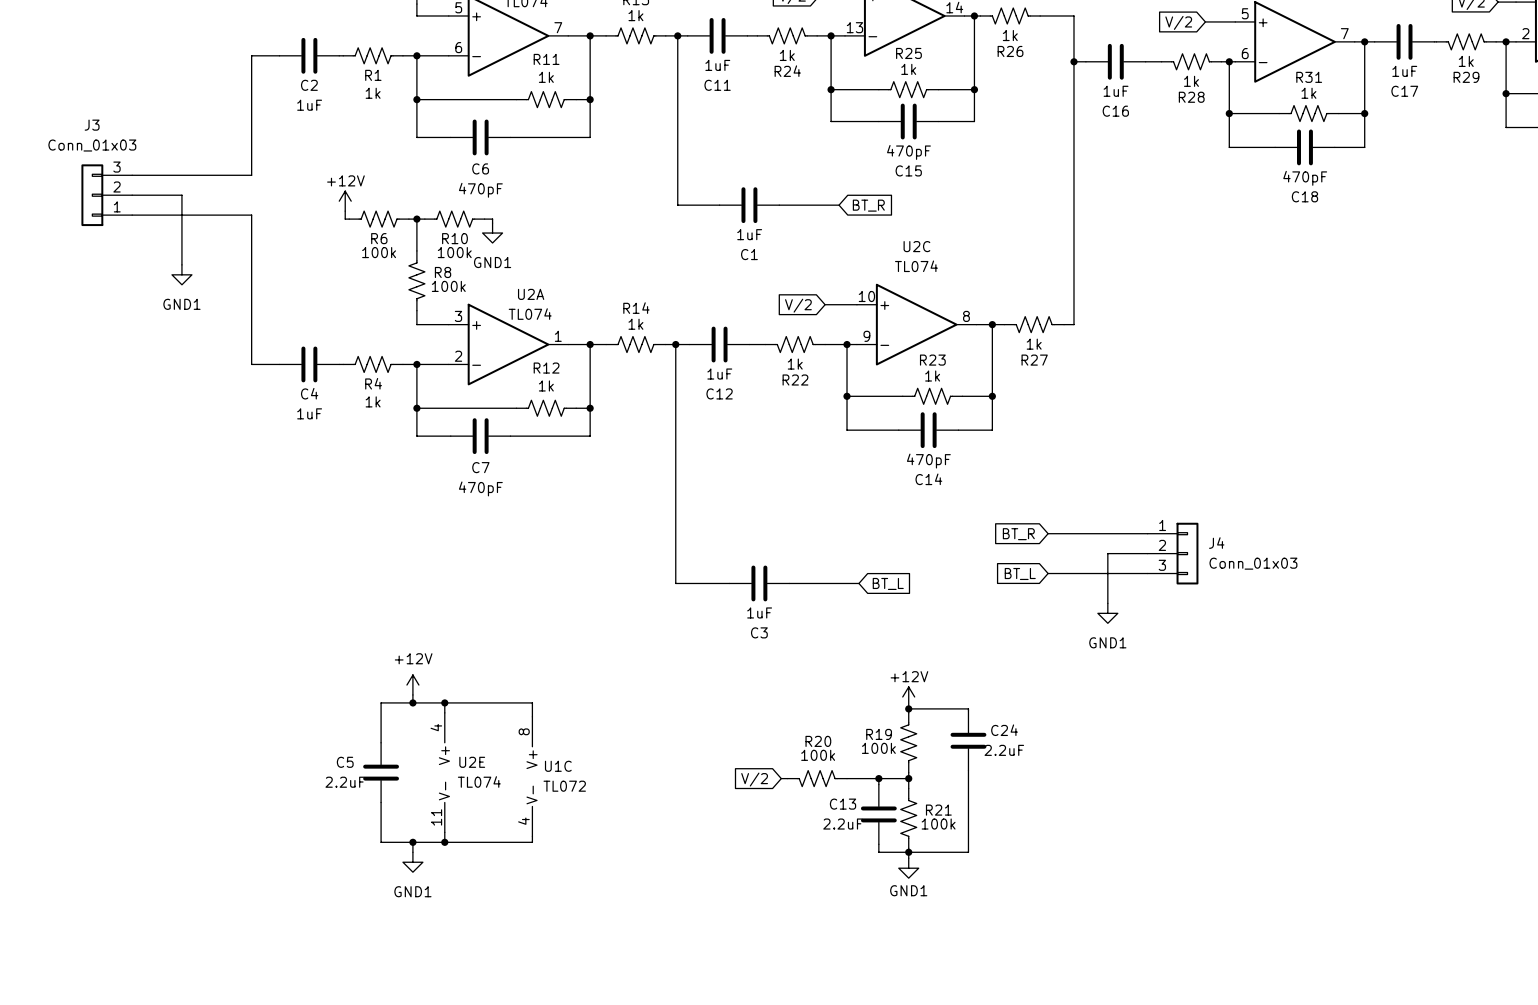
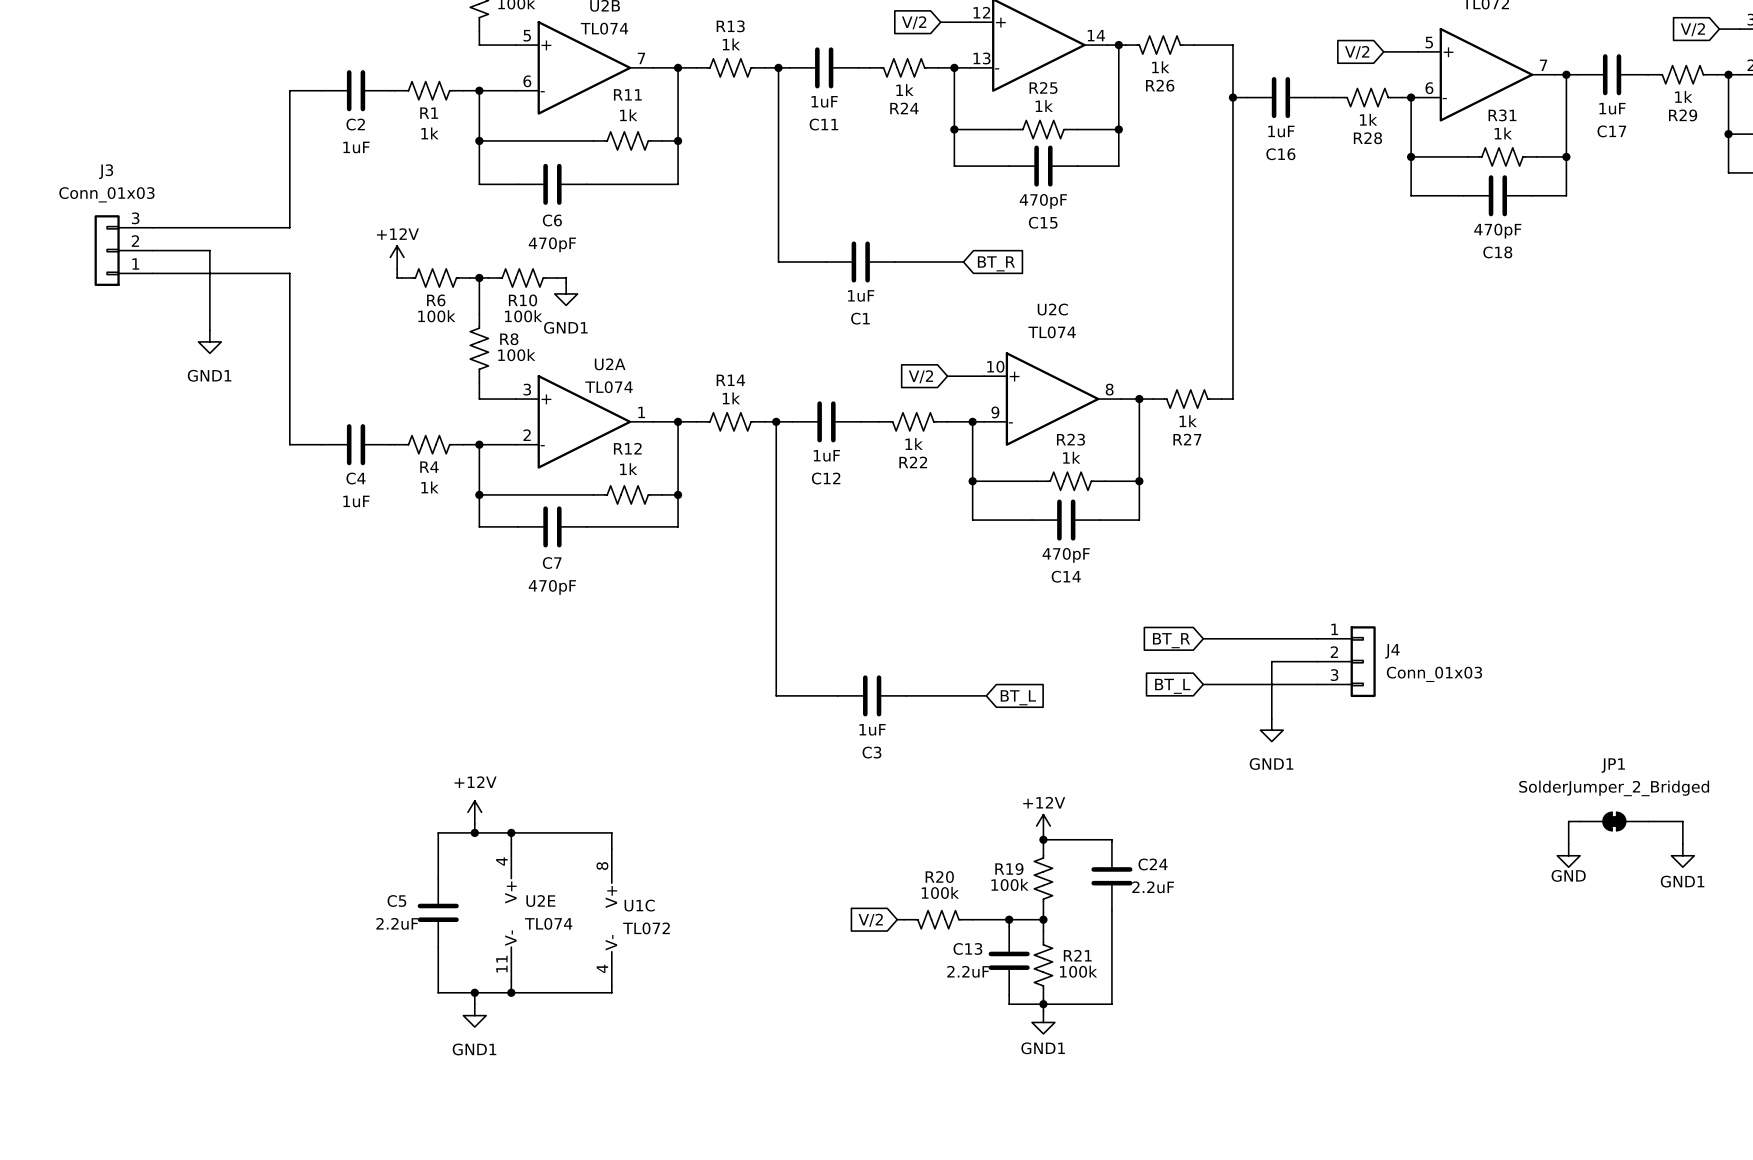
wire: none -> (1580, 821) (1568, 821) (1568, 844)
JP1: none -> SolderJumper_2_Bridged (1614, 821)
wire: none -> (1648, 821) (1682, 821) (1682, 844)
power symbol: none -> GND (1568, 855)
power symbol: none -> GND1 (1682, 855)

